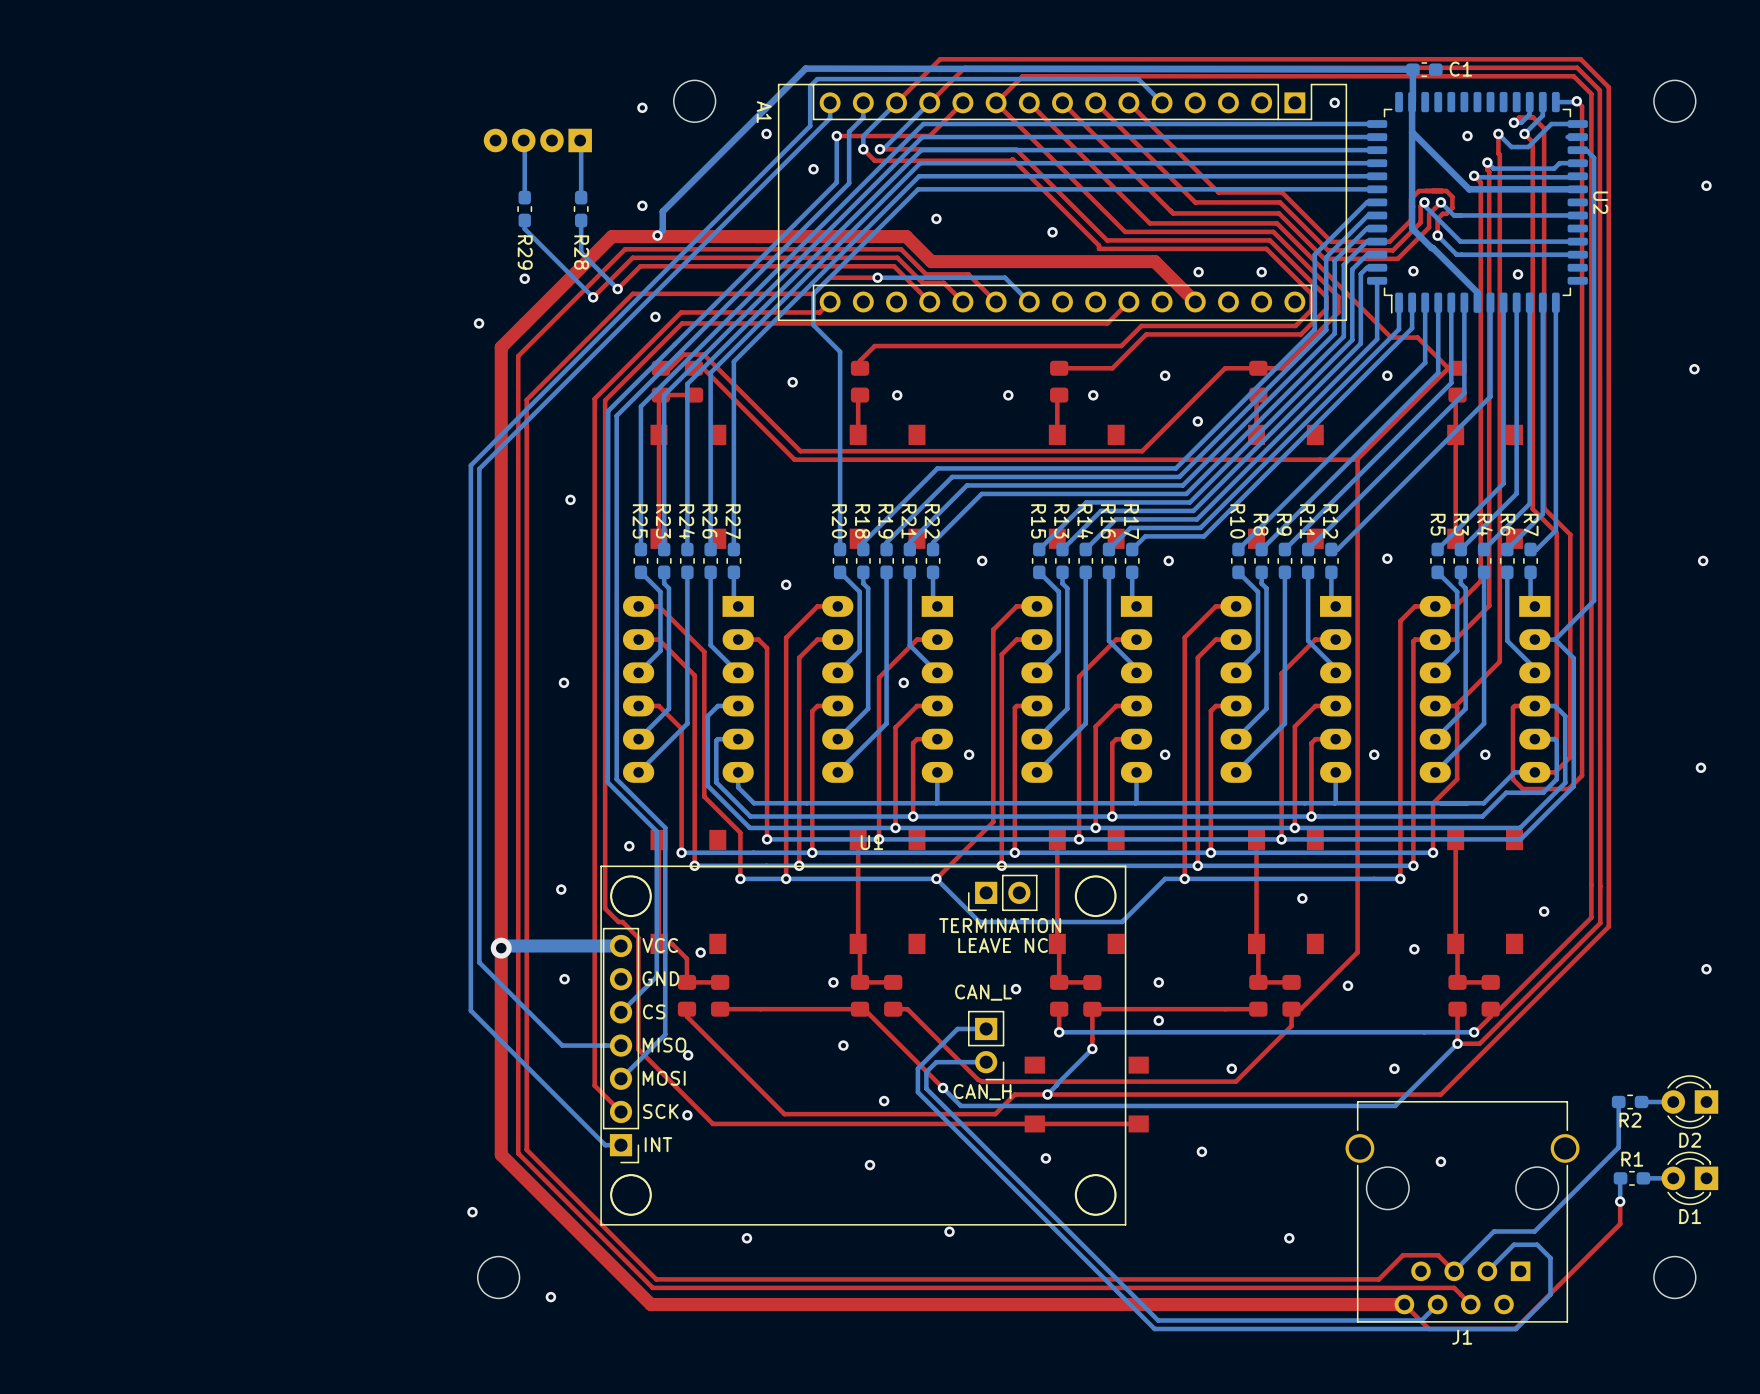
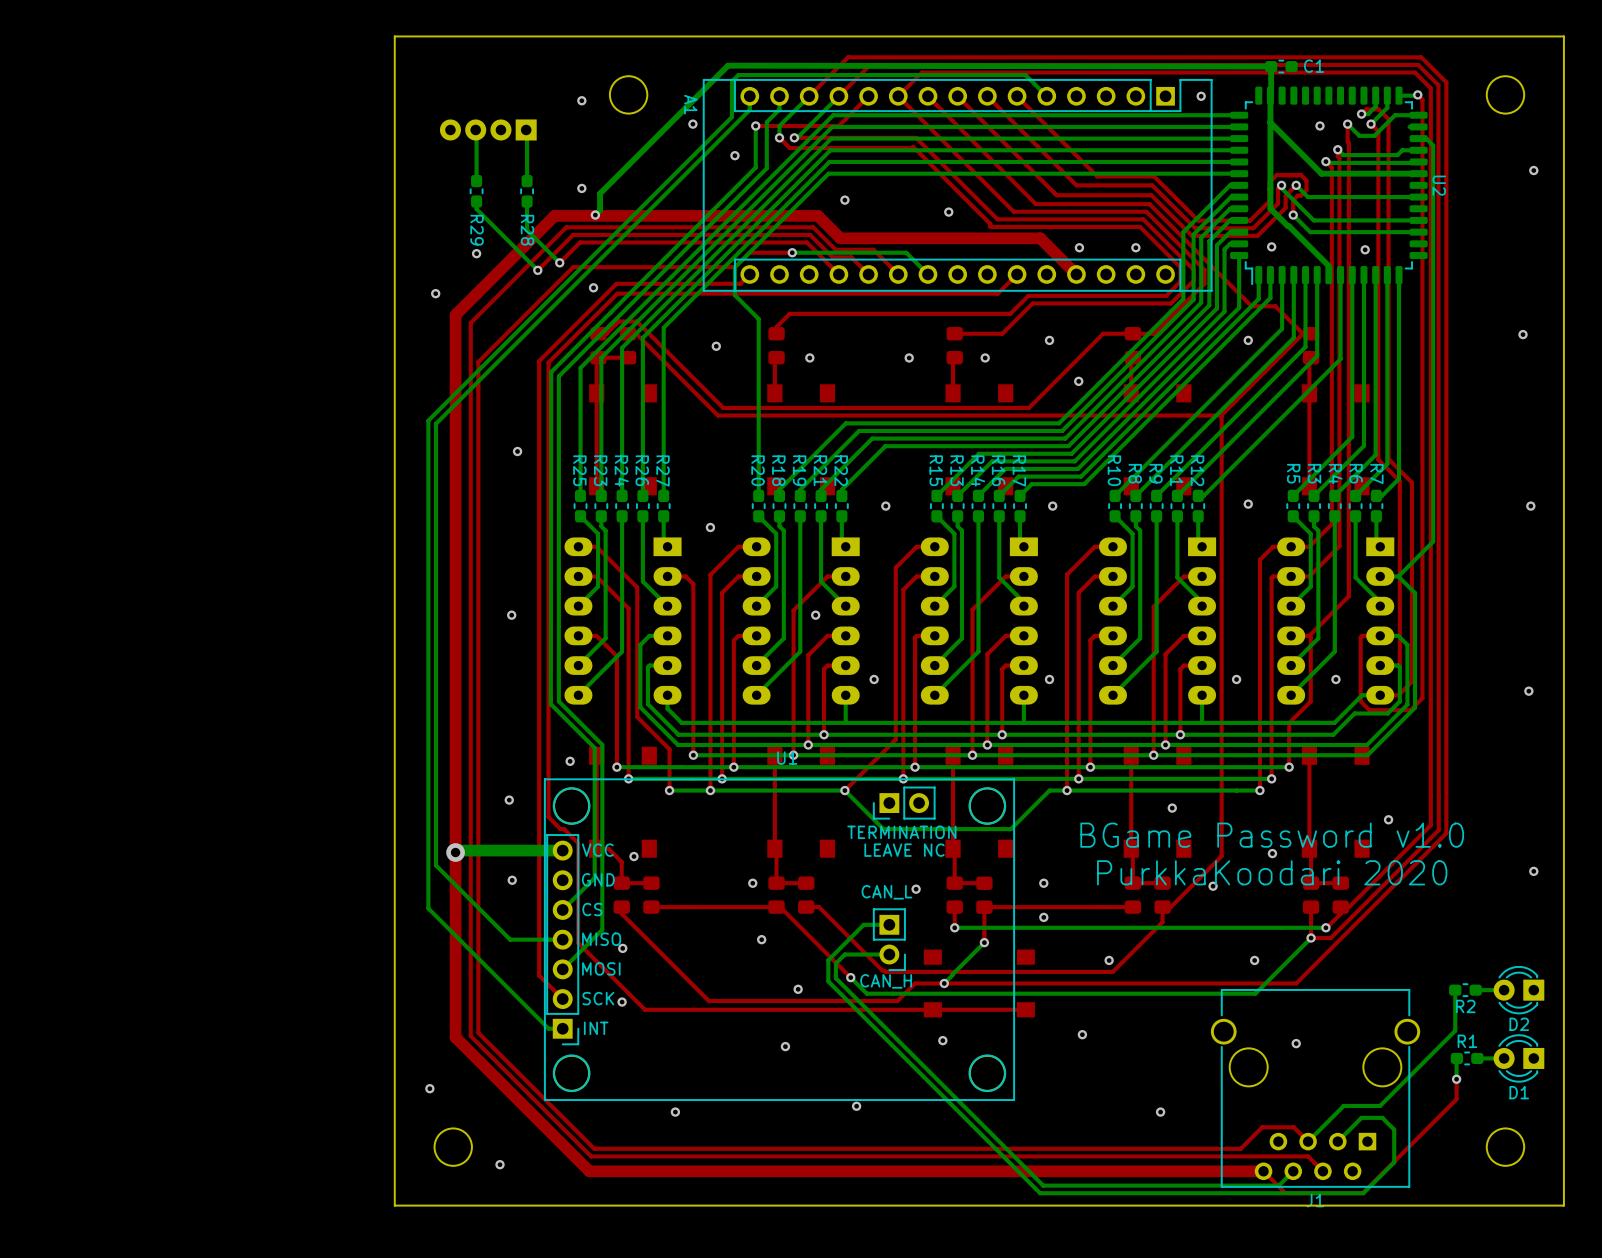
board edge: none -> (1563, 36) (1563, 1205) (394, 1205) (394, 36) (1563, 36)
text: none -> BGame Password v1.0 (1272, 835)
text: none -> PurkkaKoodari 2020 (1272, 872)

